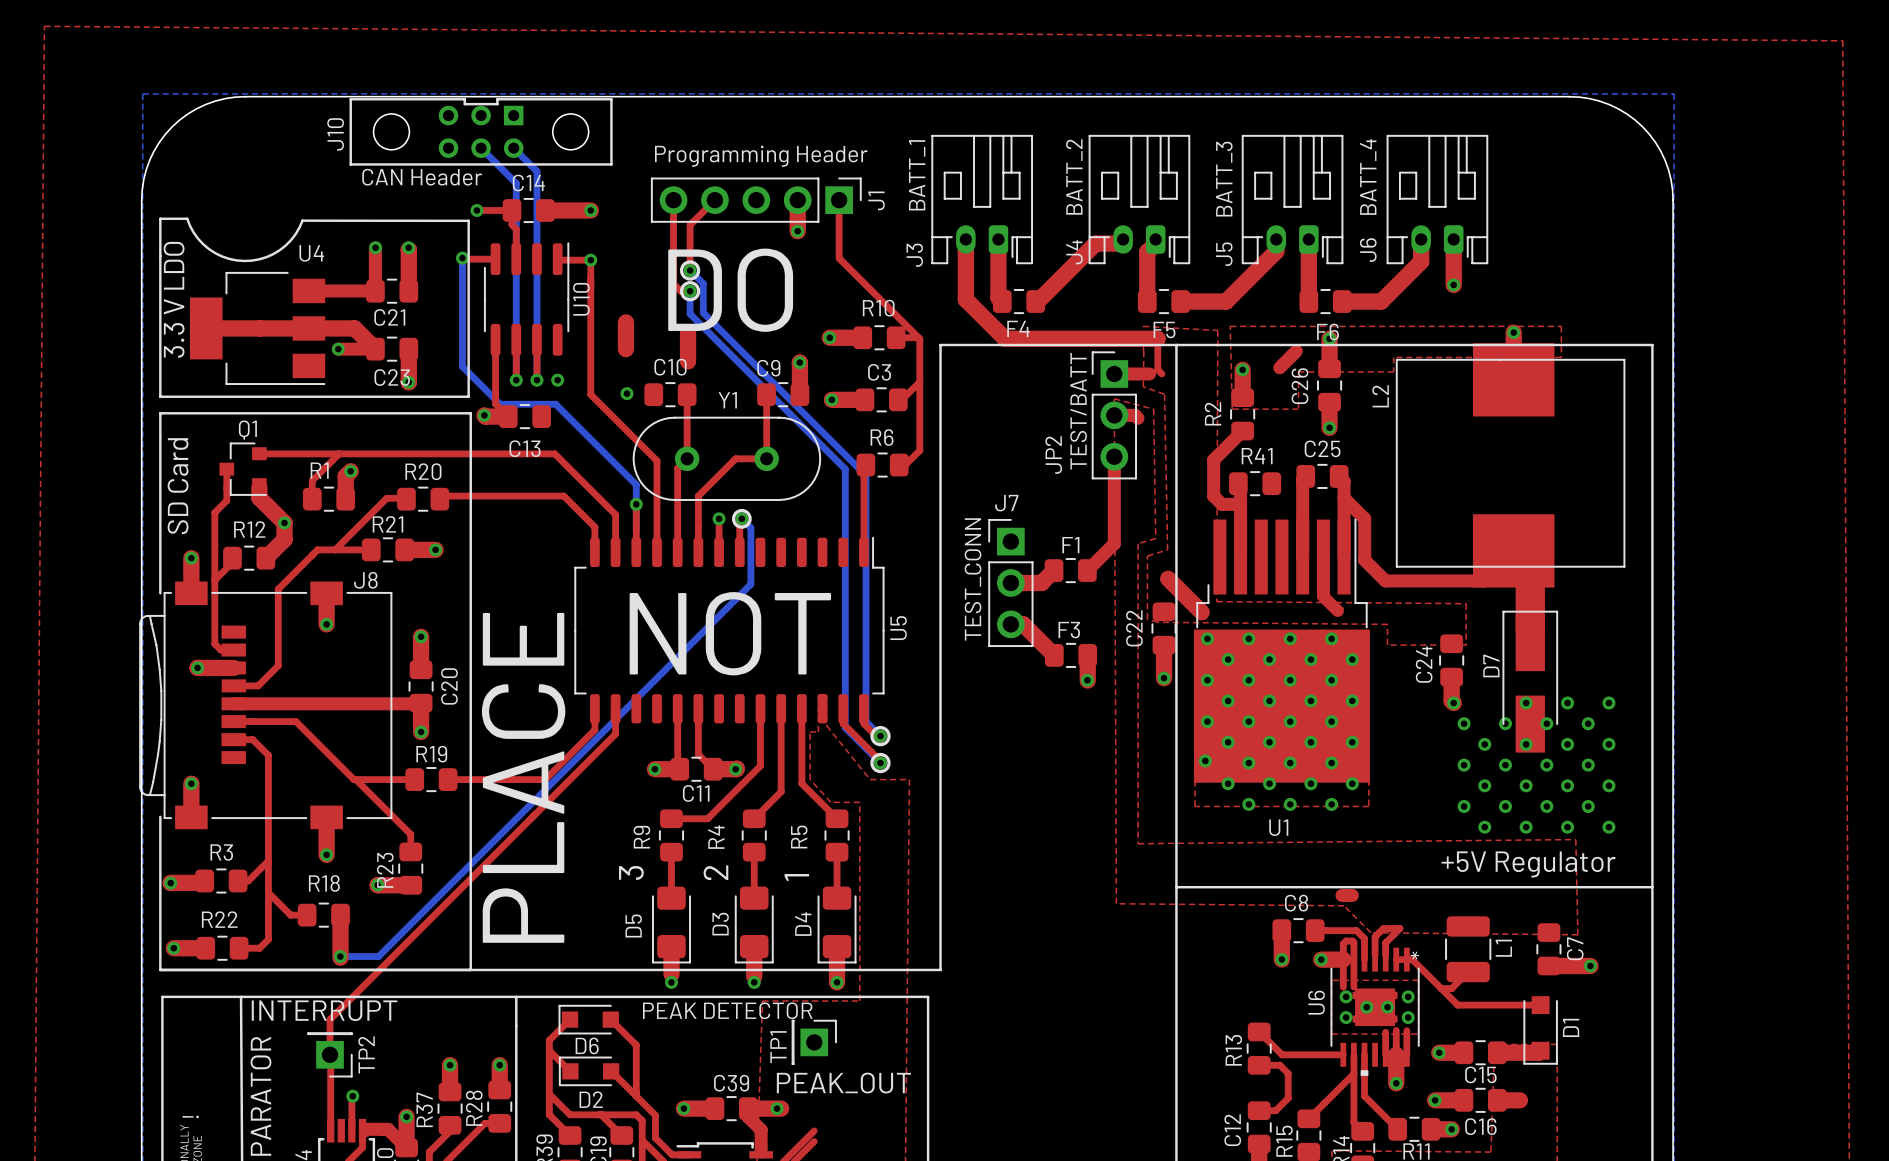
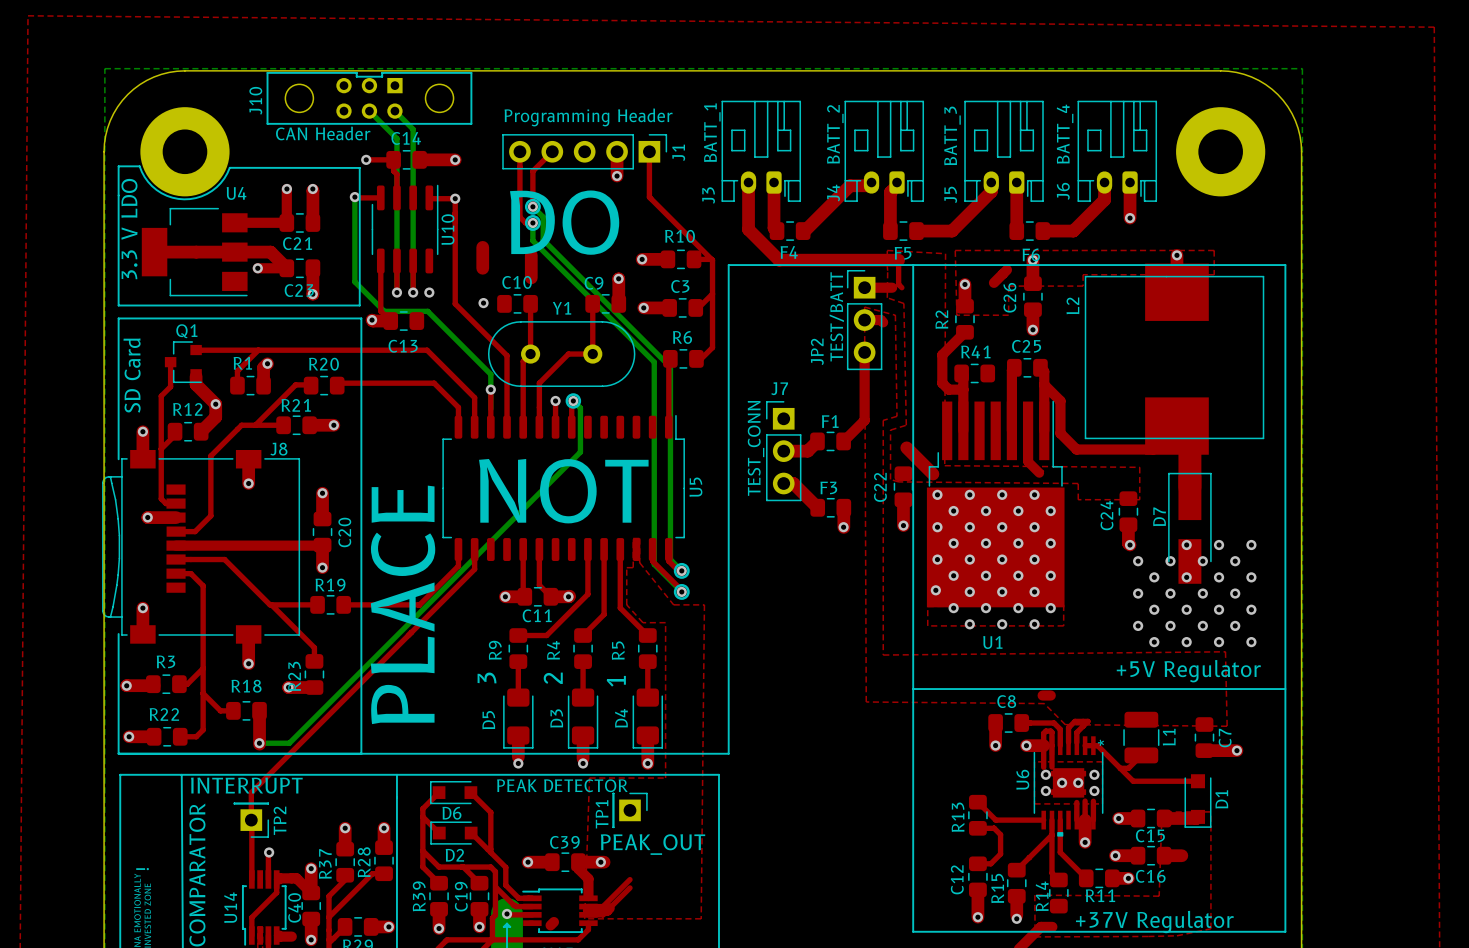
part: none -> (184, 151)
part: none -> (1220, 151)

